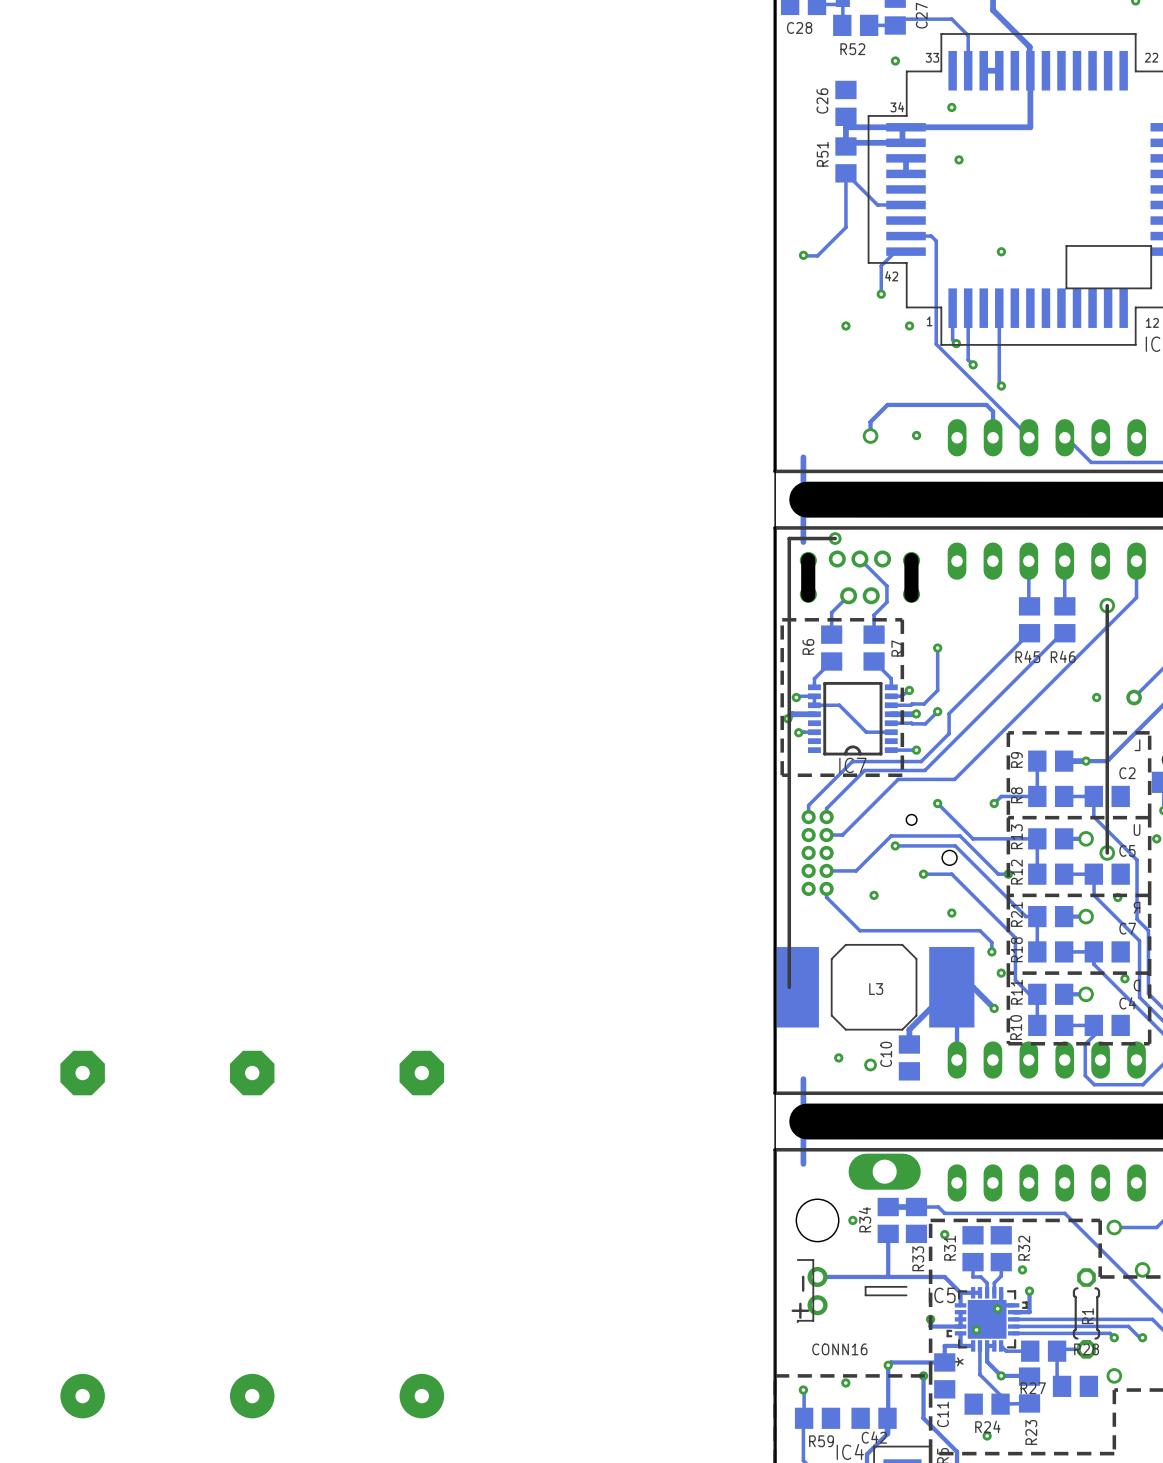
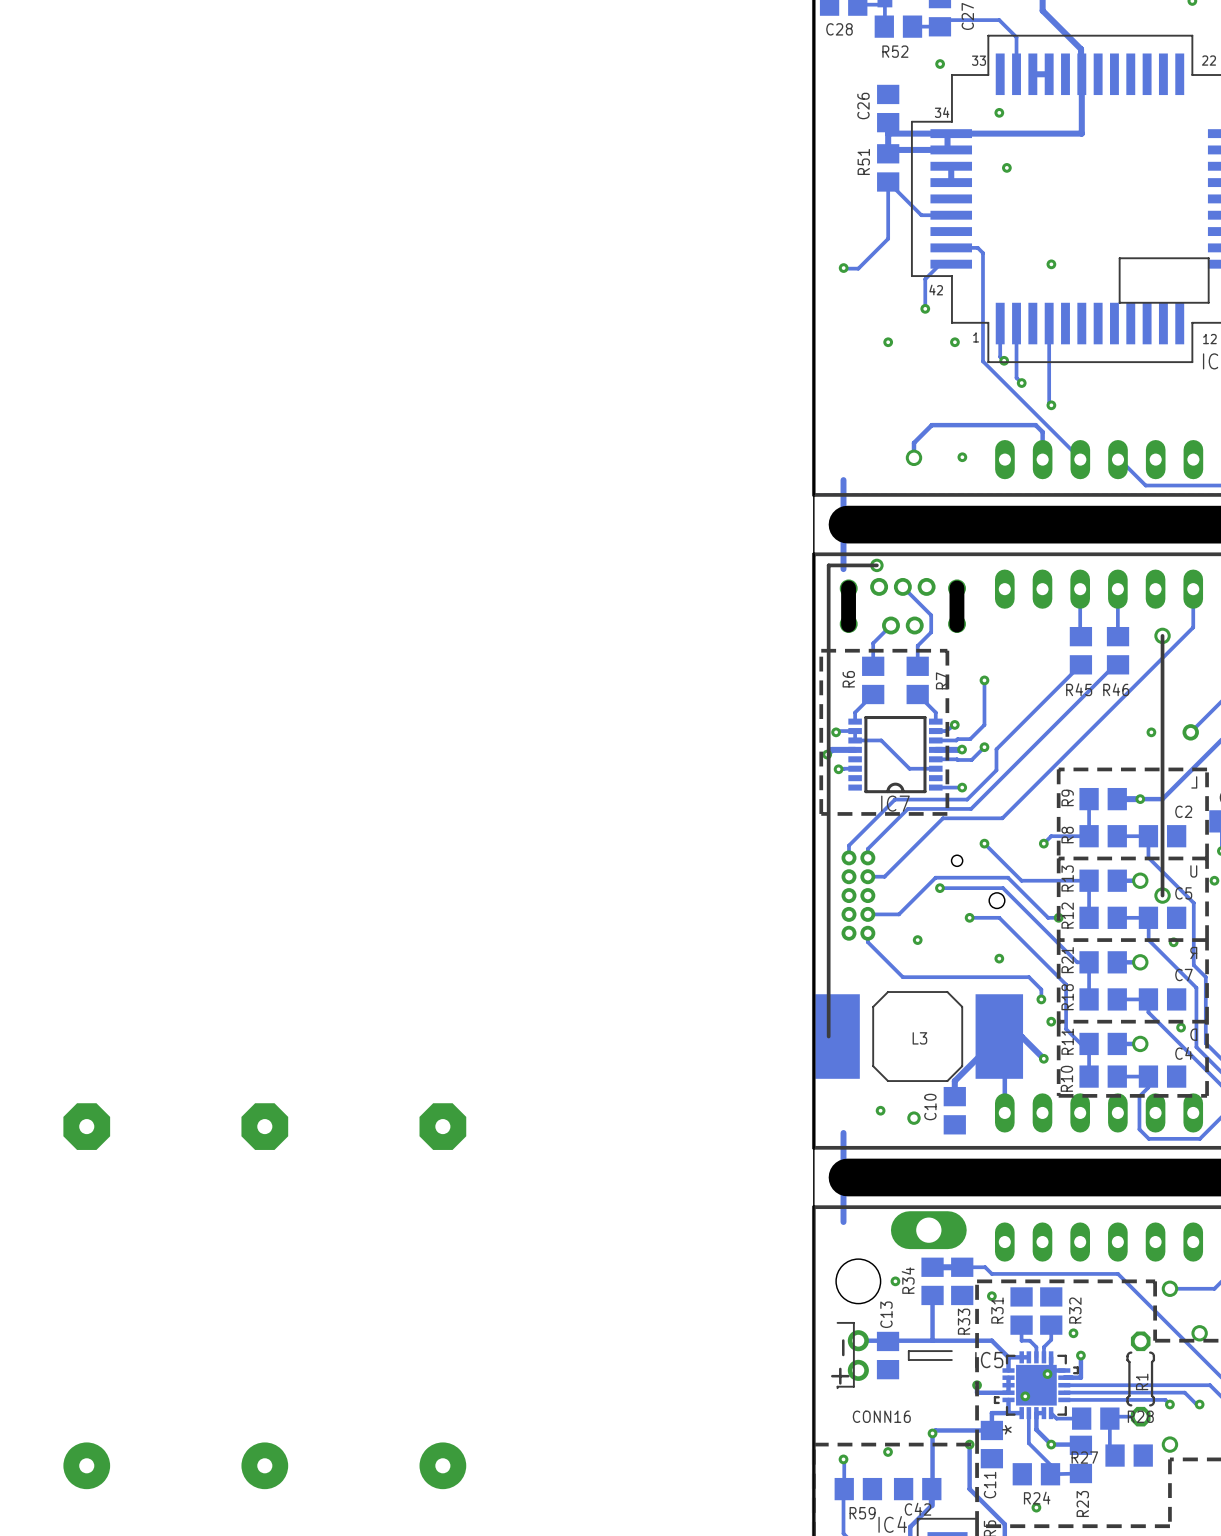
C13: none -> (888, 1355)

